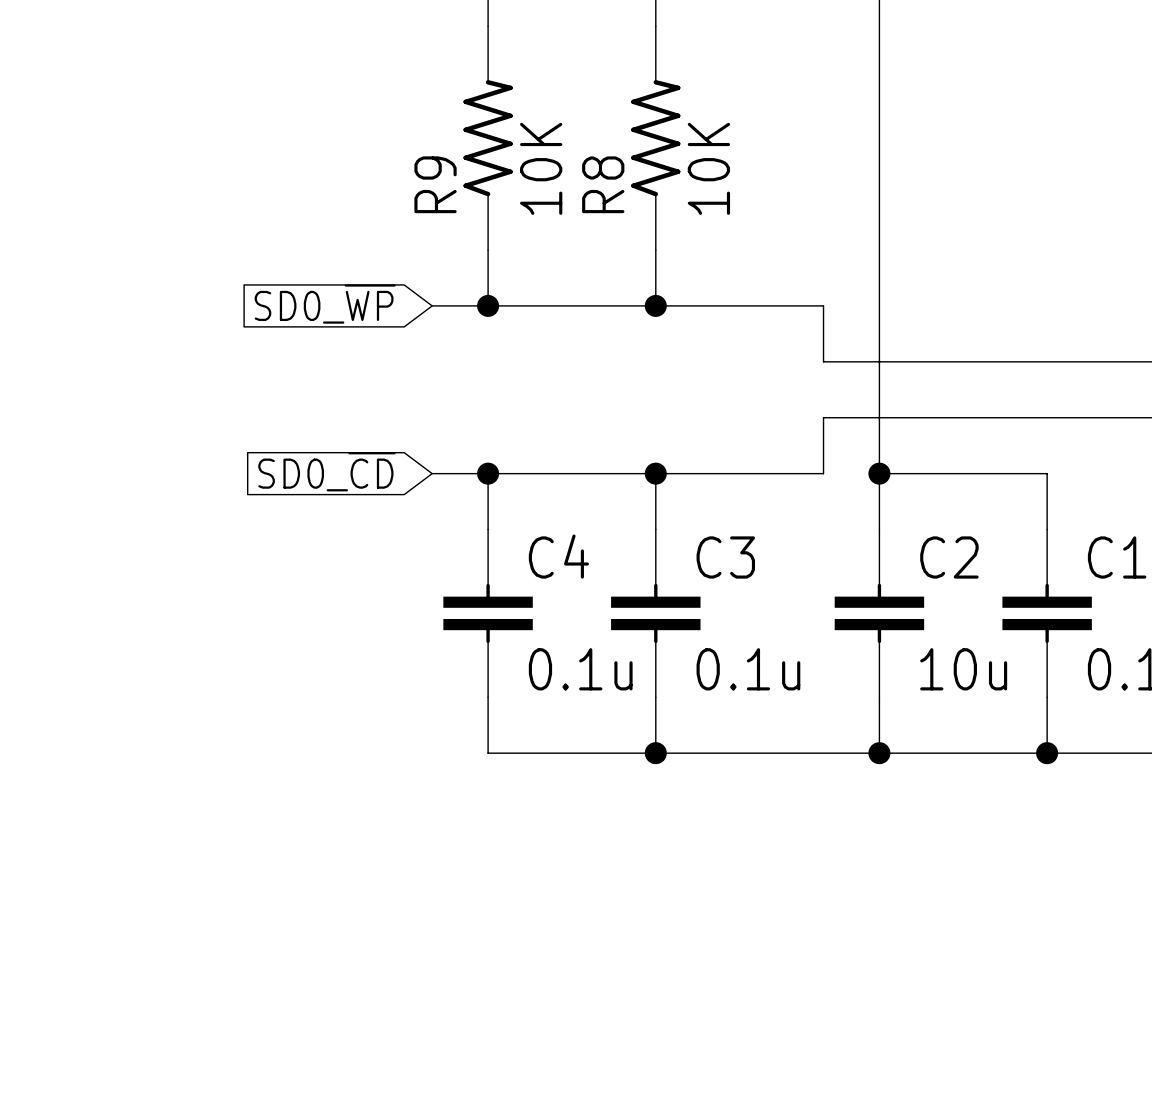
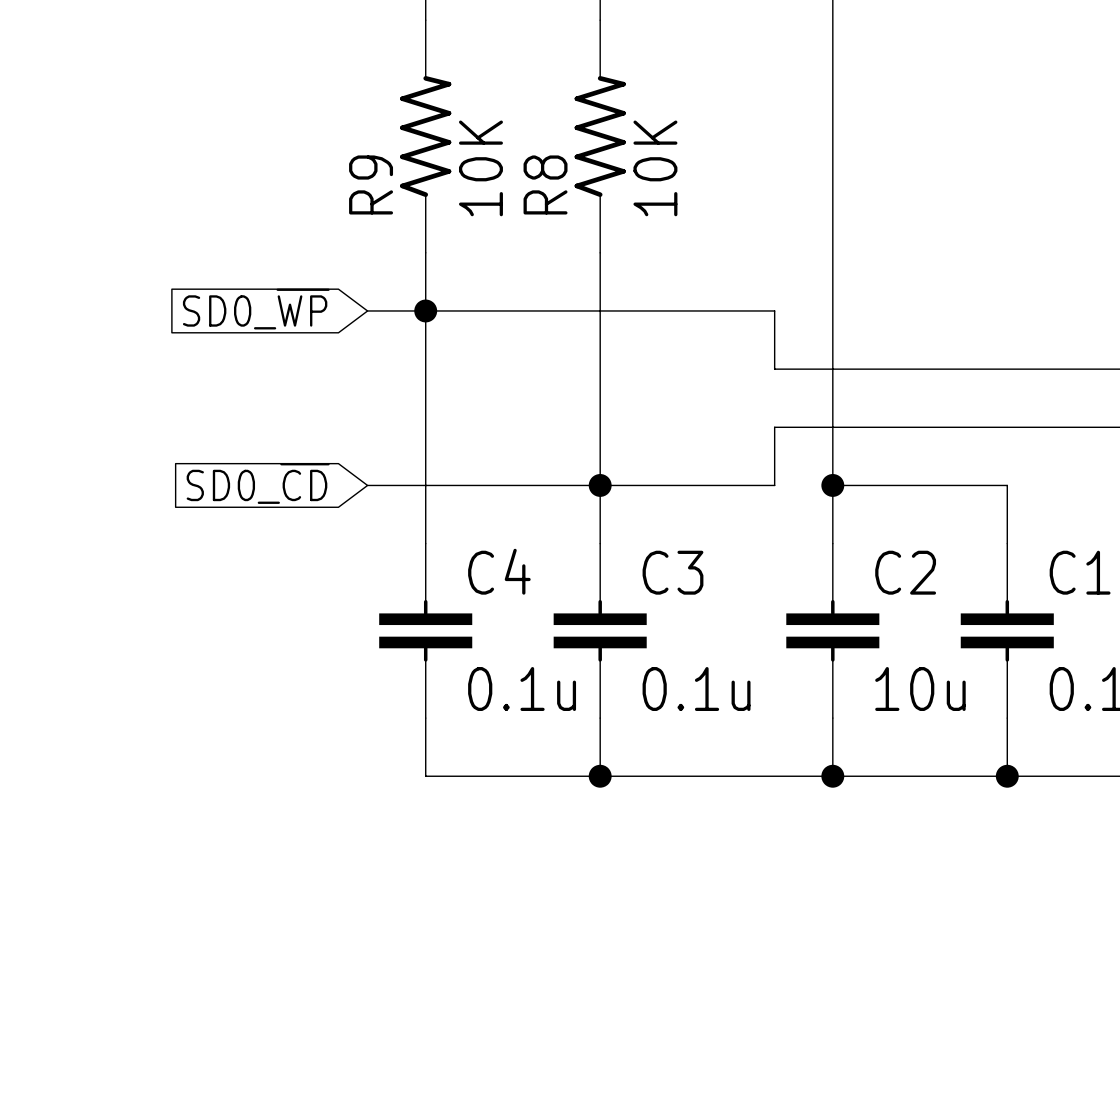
wire: none -> (425, 310) (425, 485)
wire: none -> (600, 310) (600, 485)
junction: (655, 305) -> none
junction: (488, 473) -> none

